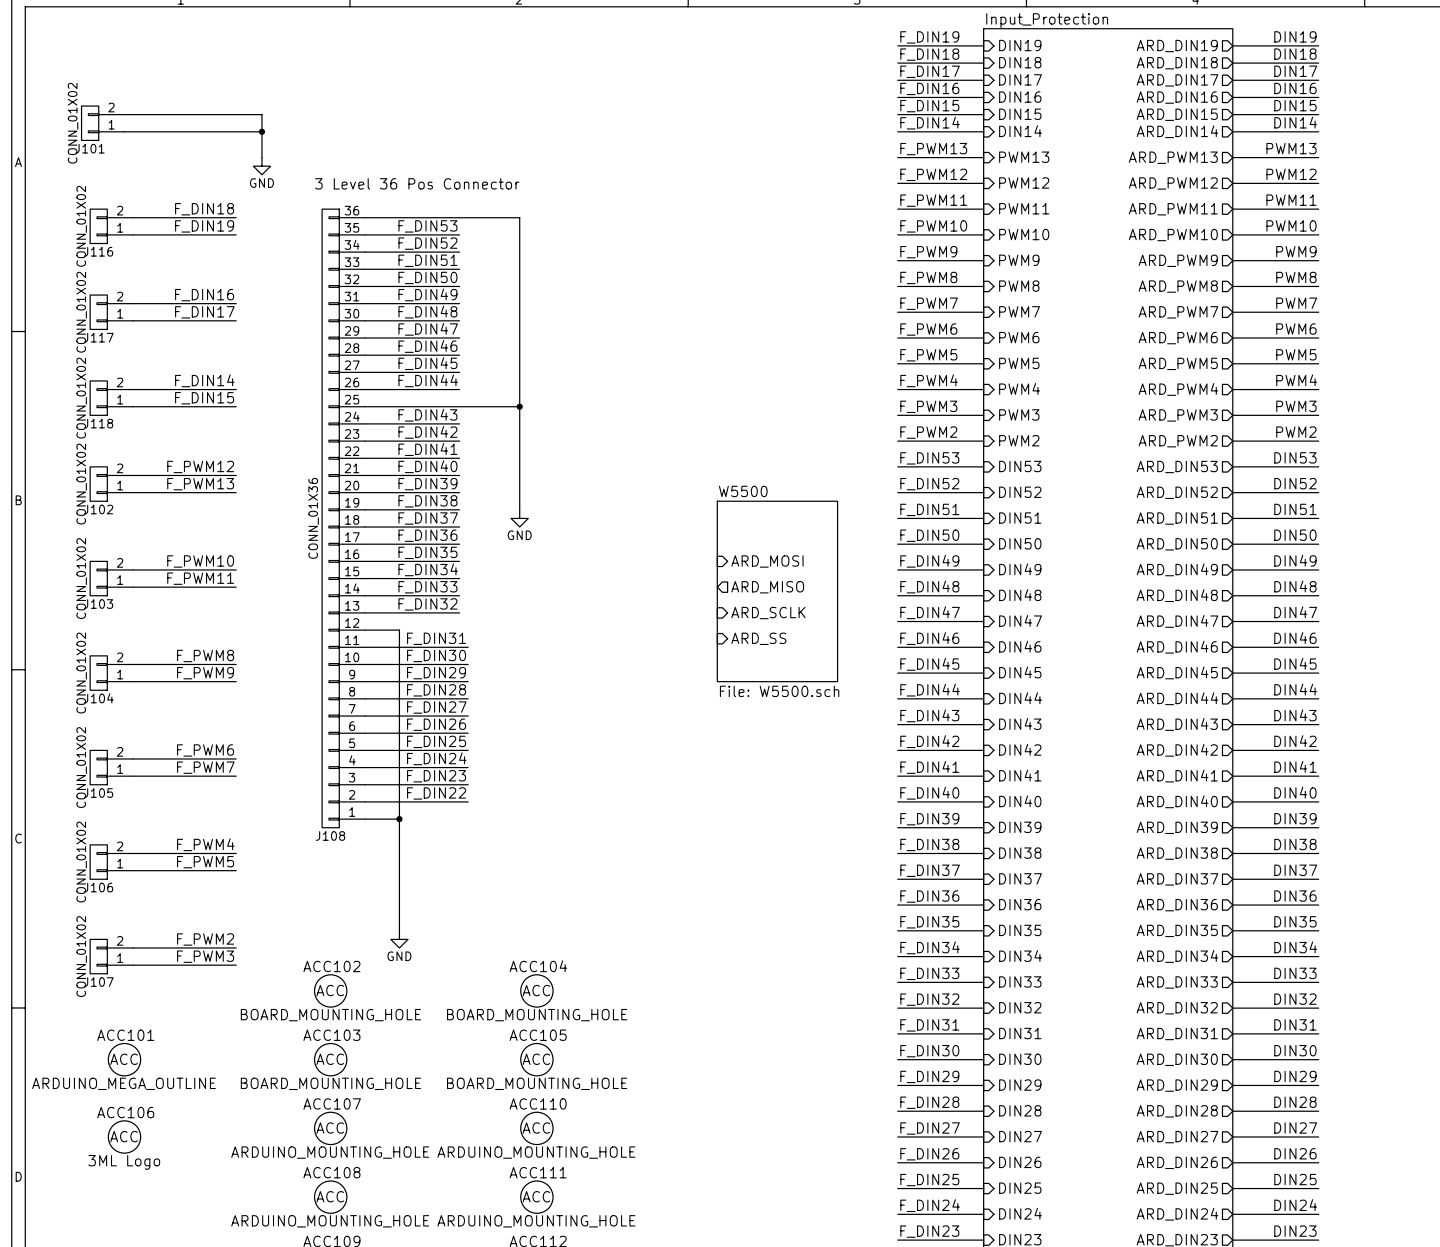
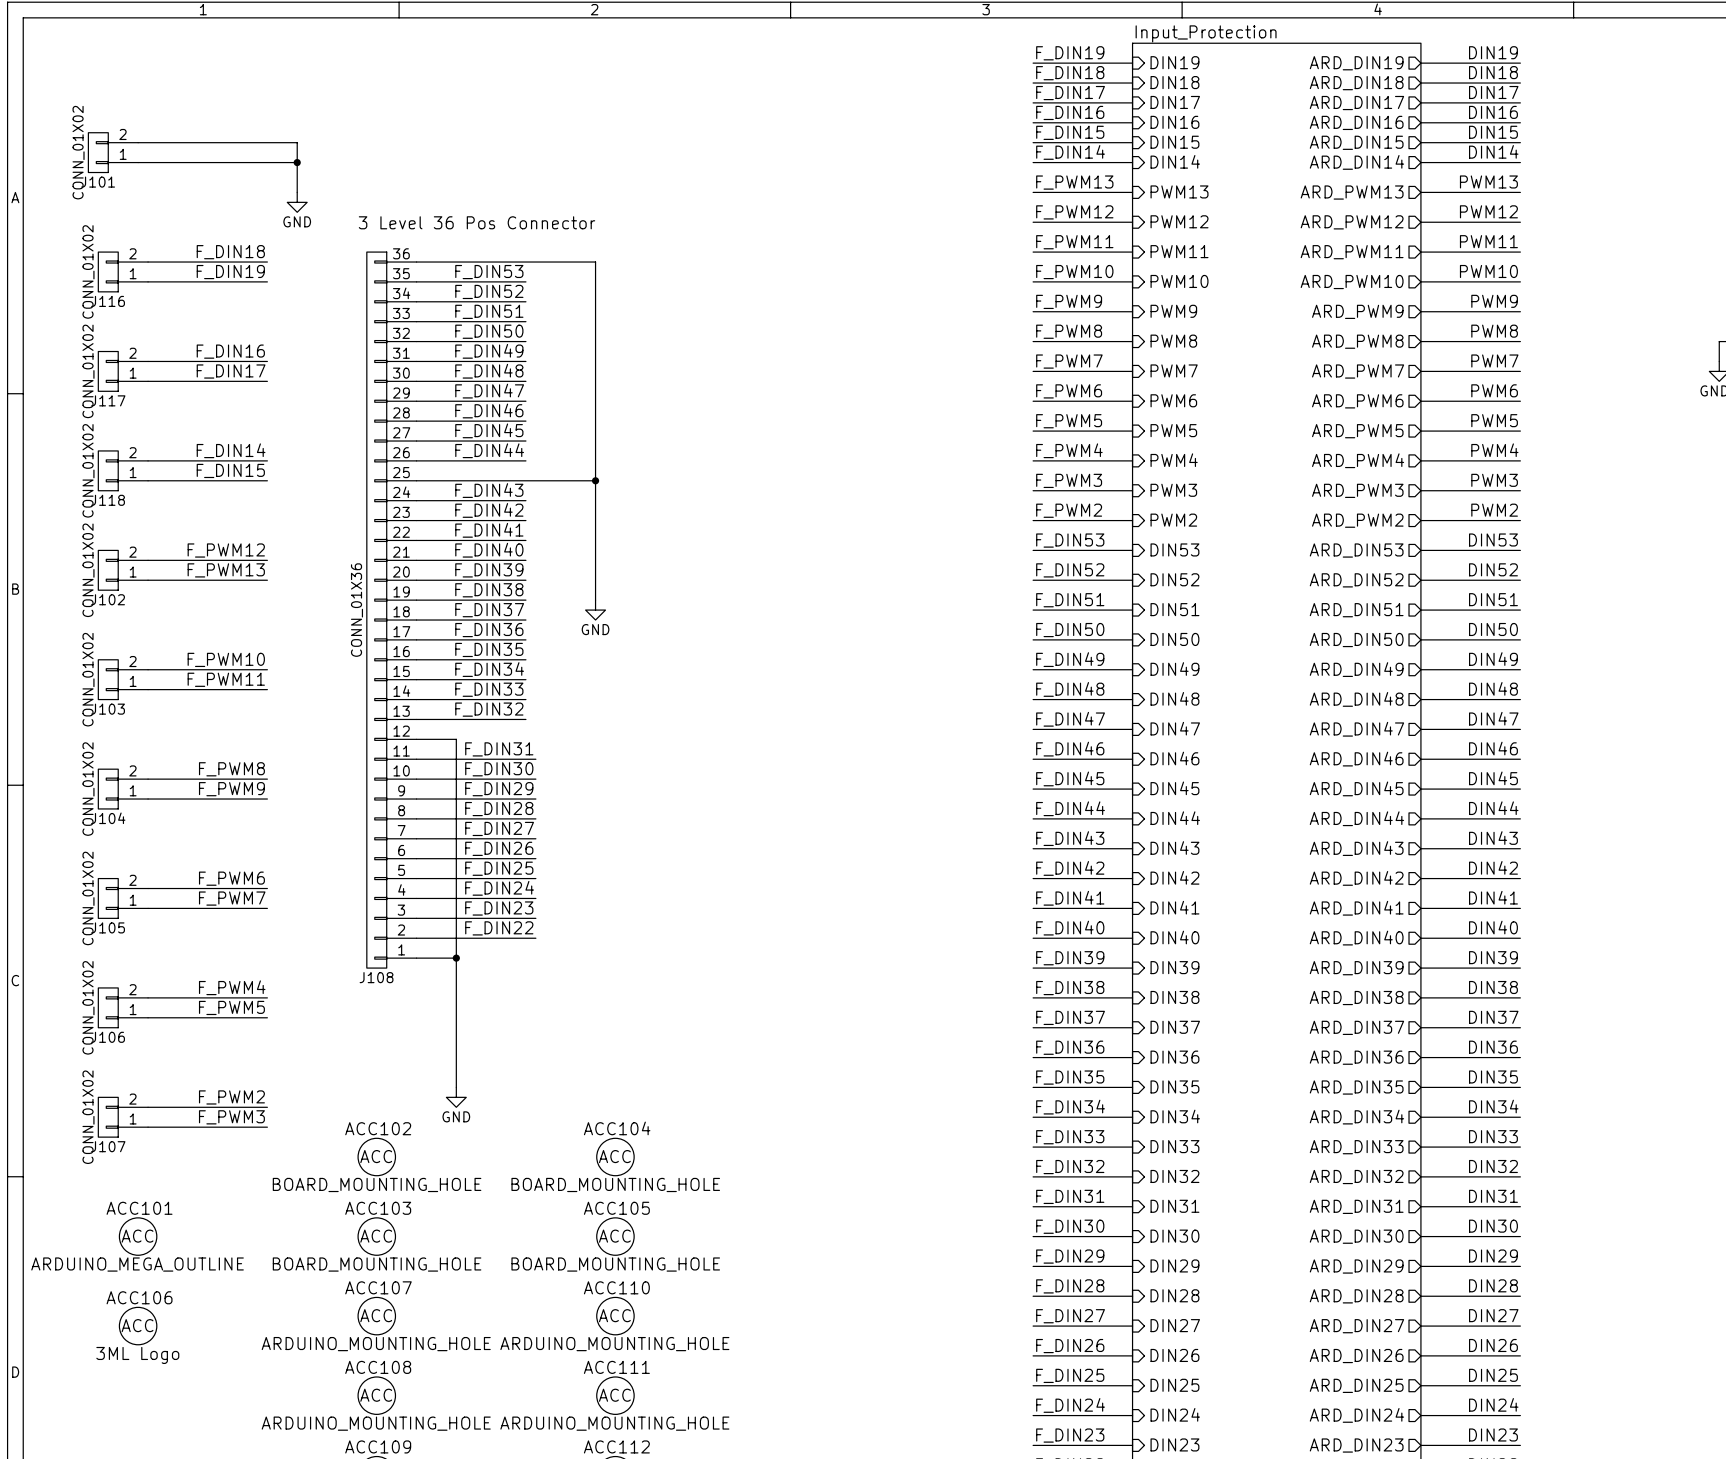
sheet pin: ARD_MOSI (767, 561) -> none
sheet pin: ARD_MISO (767, 587) -> none
sheet W5500: File: W5500.sch (777, 591) -> none
sheet pin: ARD_SCLK (768, 613) -> none
sheet pin: ARD_SS (758, 638) -> none

